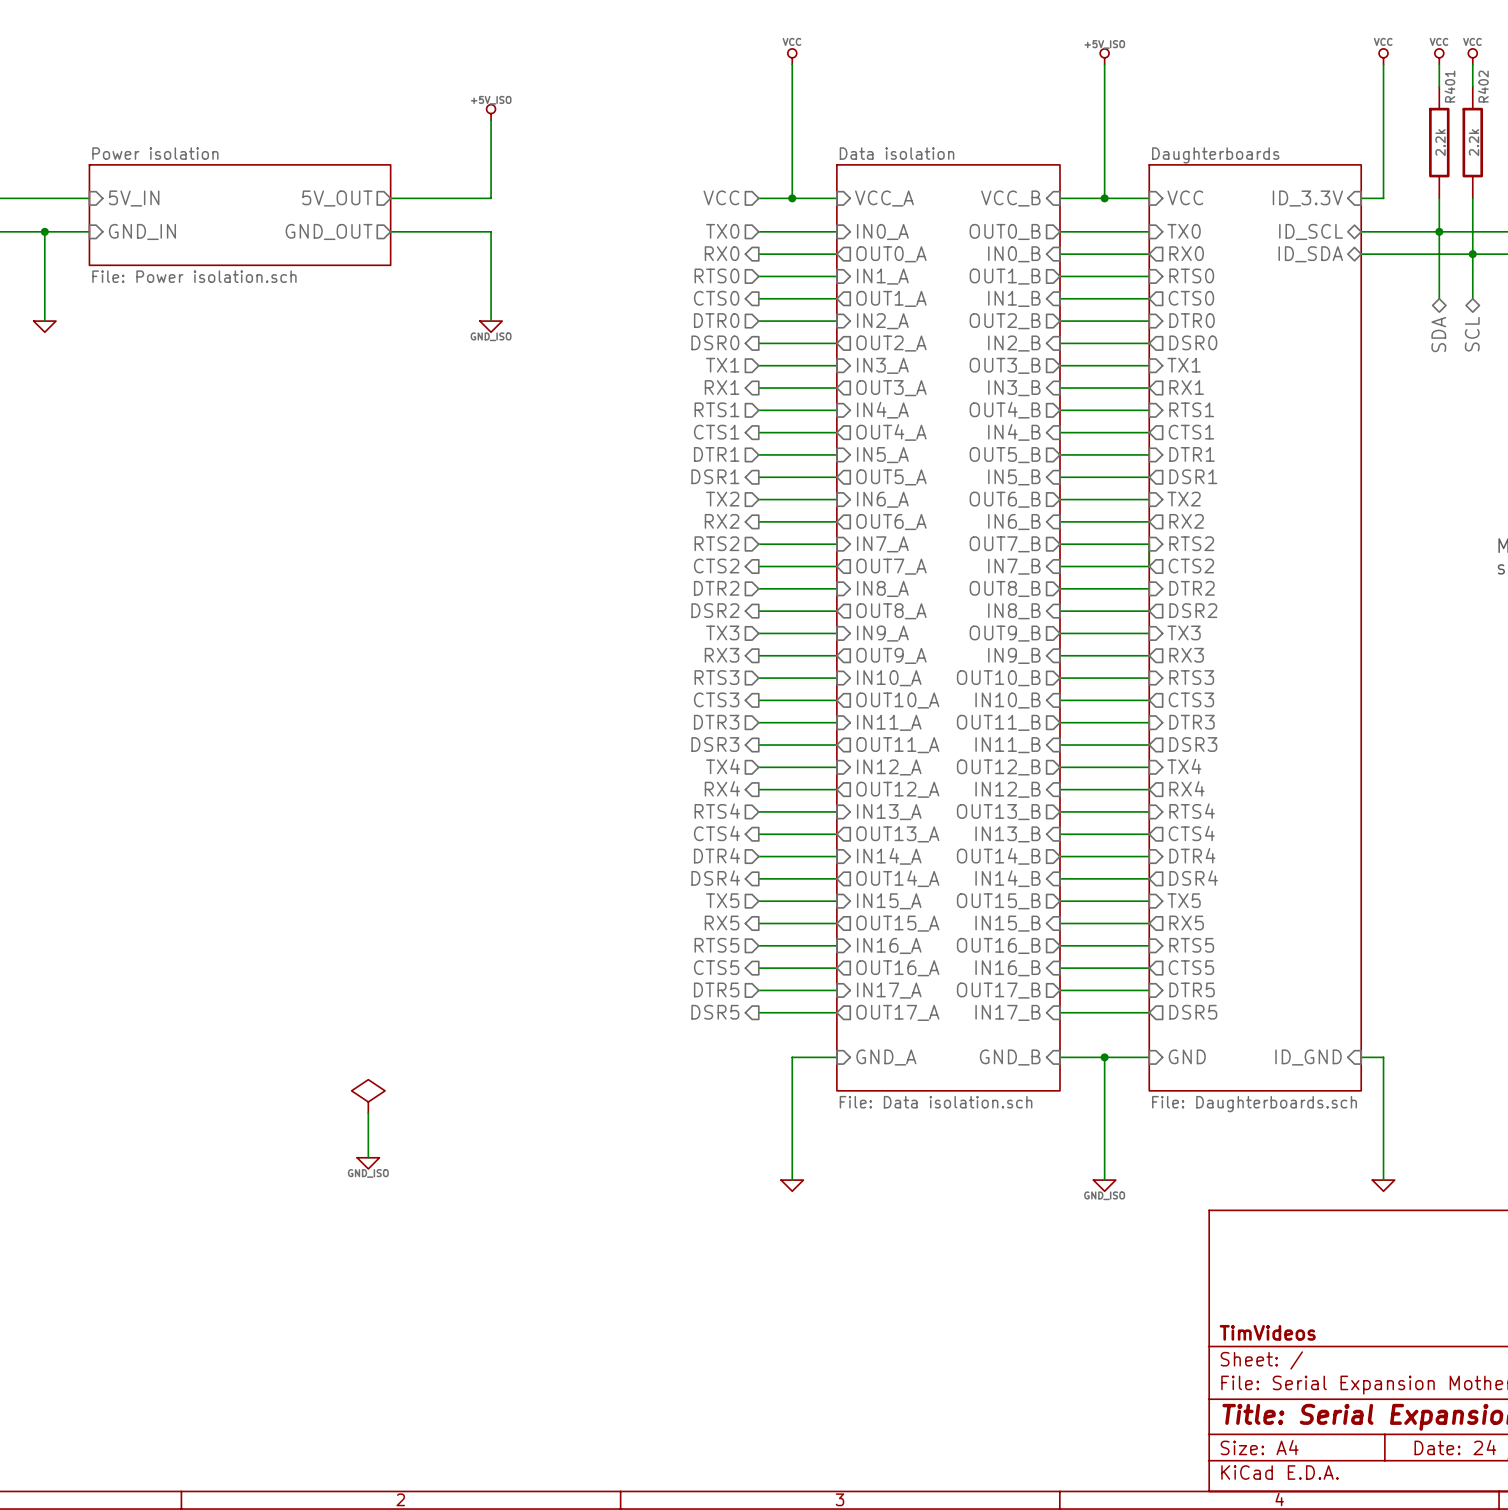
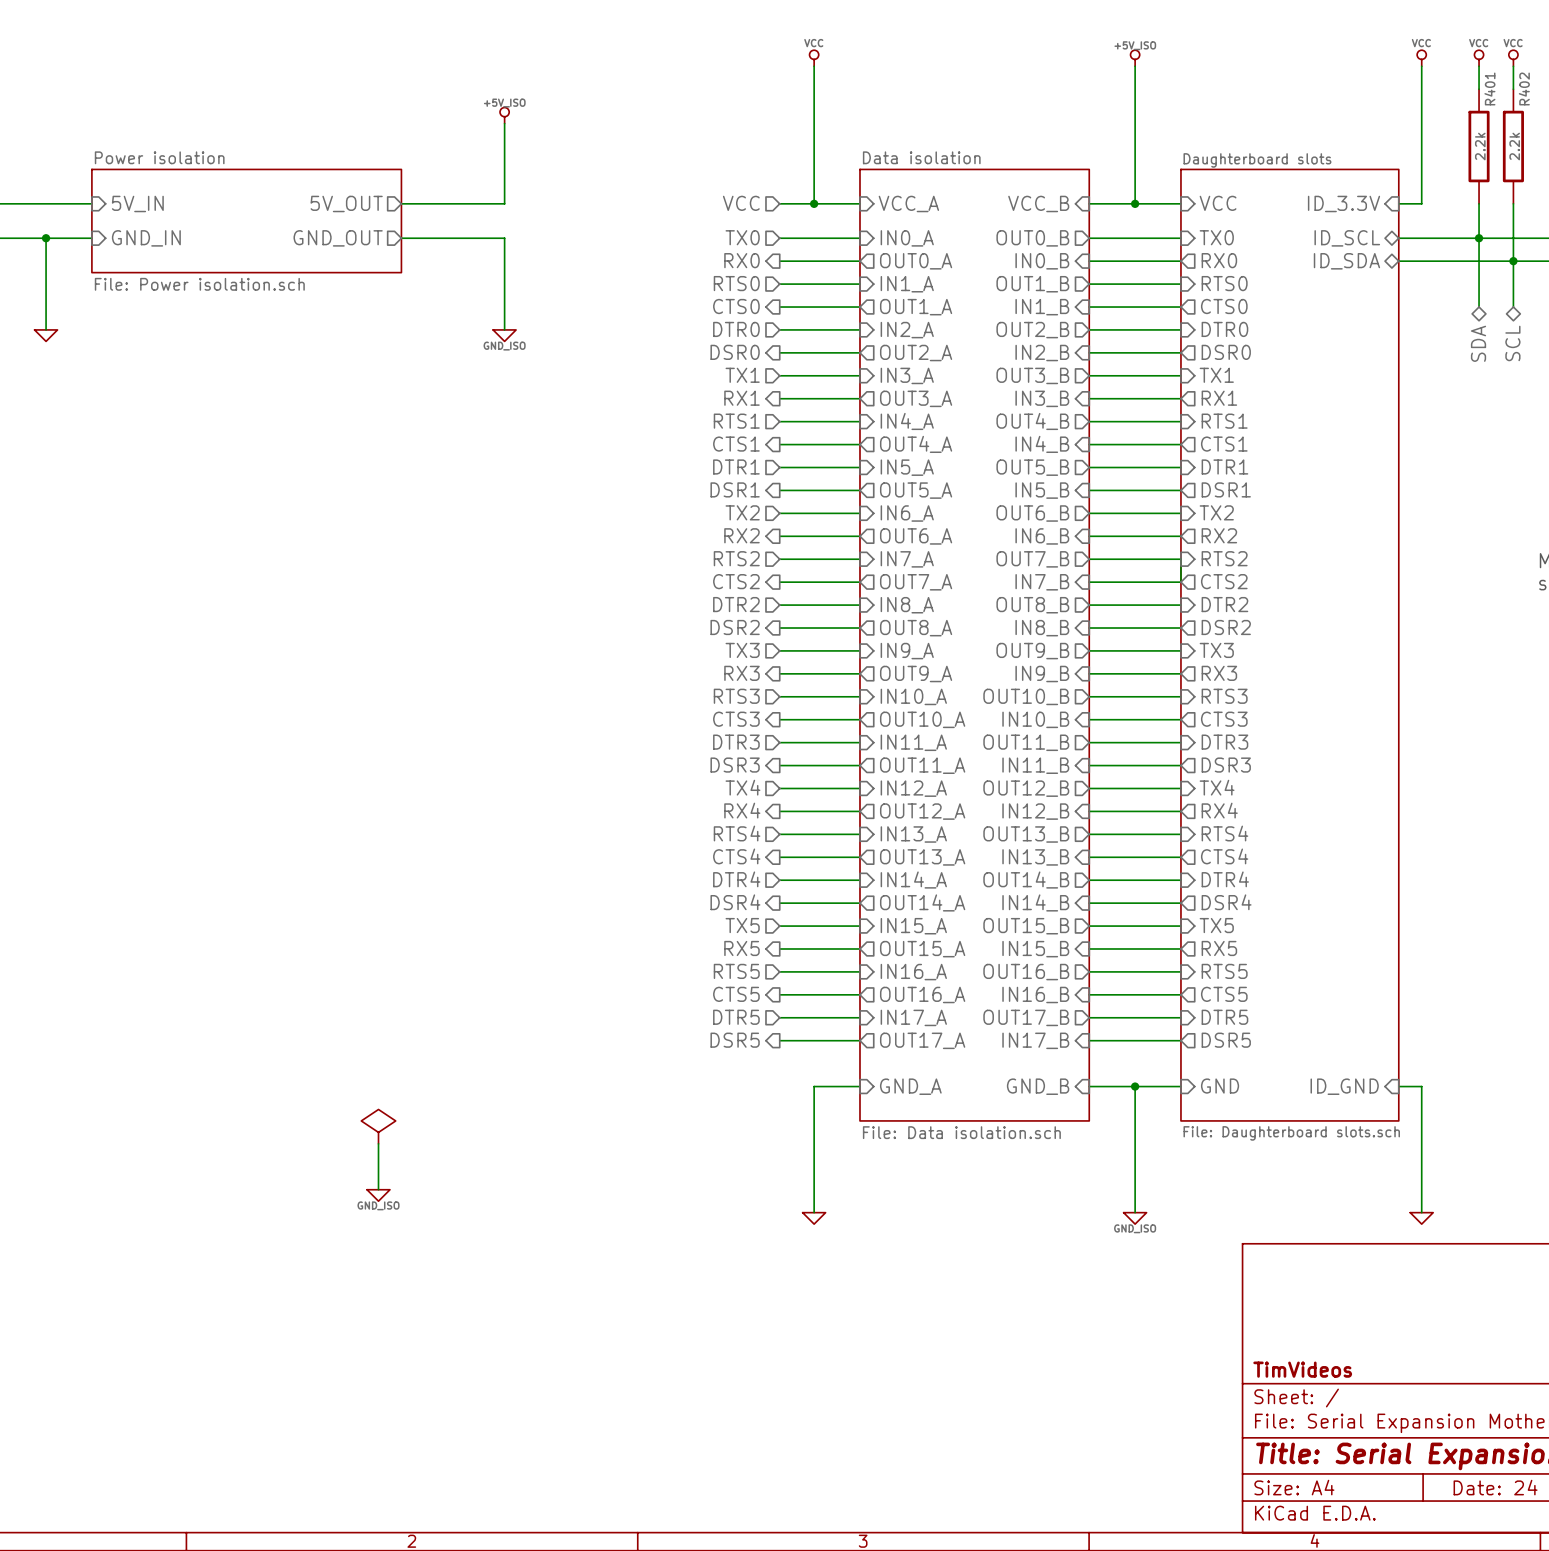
sheet Daughterboards name: Daughterboards (1215, 155) -> Daughterboard slots (1257, 160)
sheet Daughterboards value: File: Daughterboards.sch (1254, 1104) -> File: Daughterboard slots.sch (1291, 1133)

